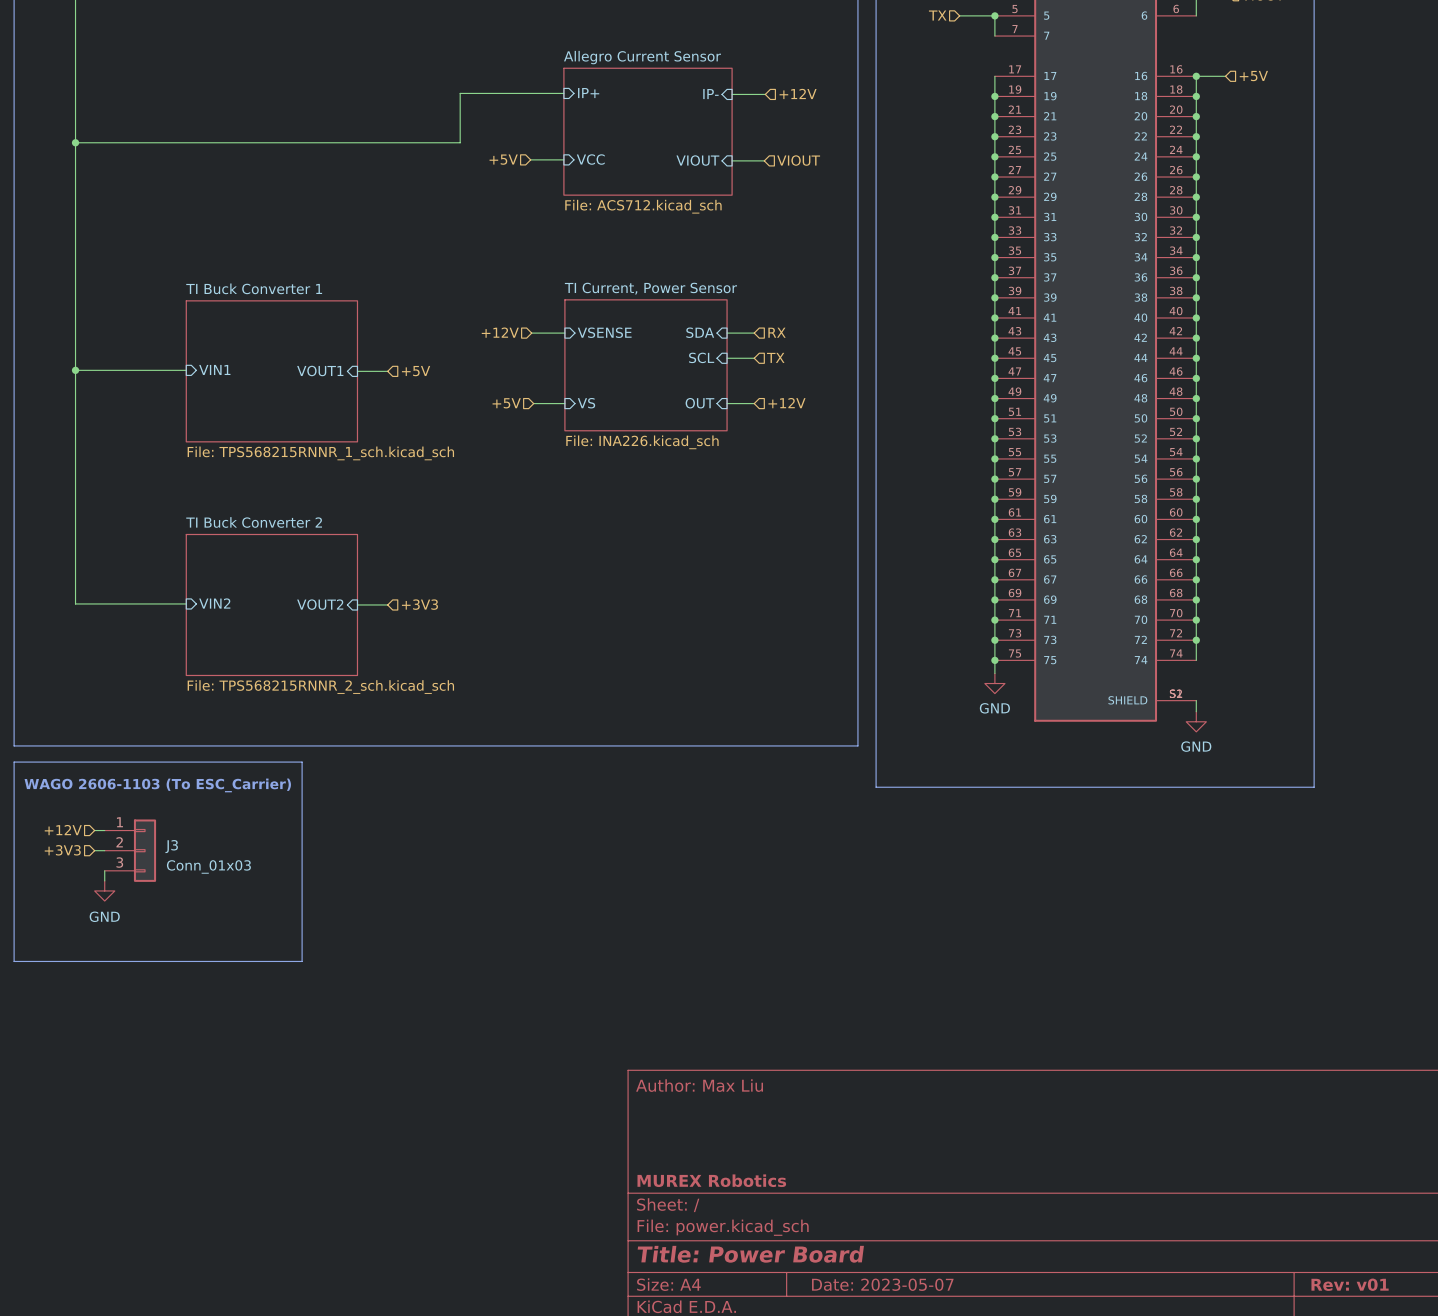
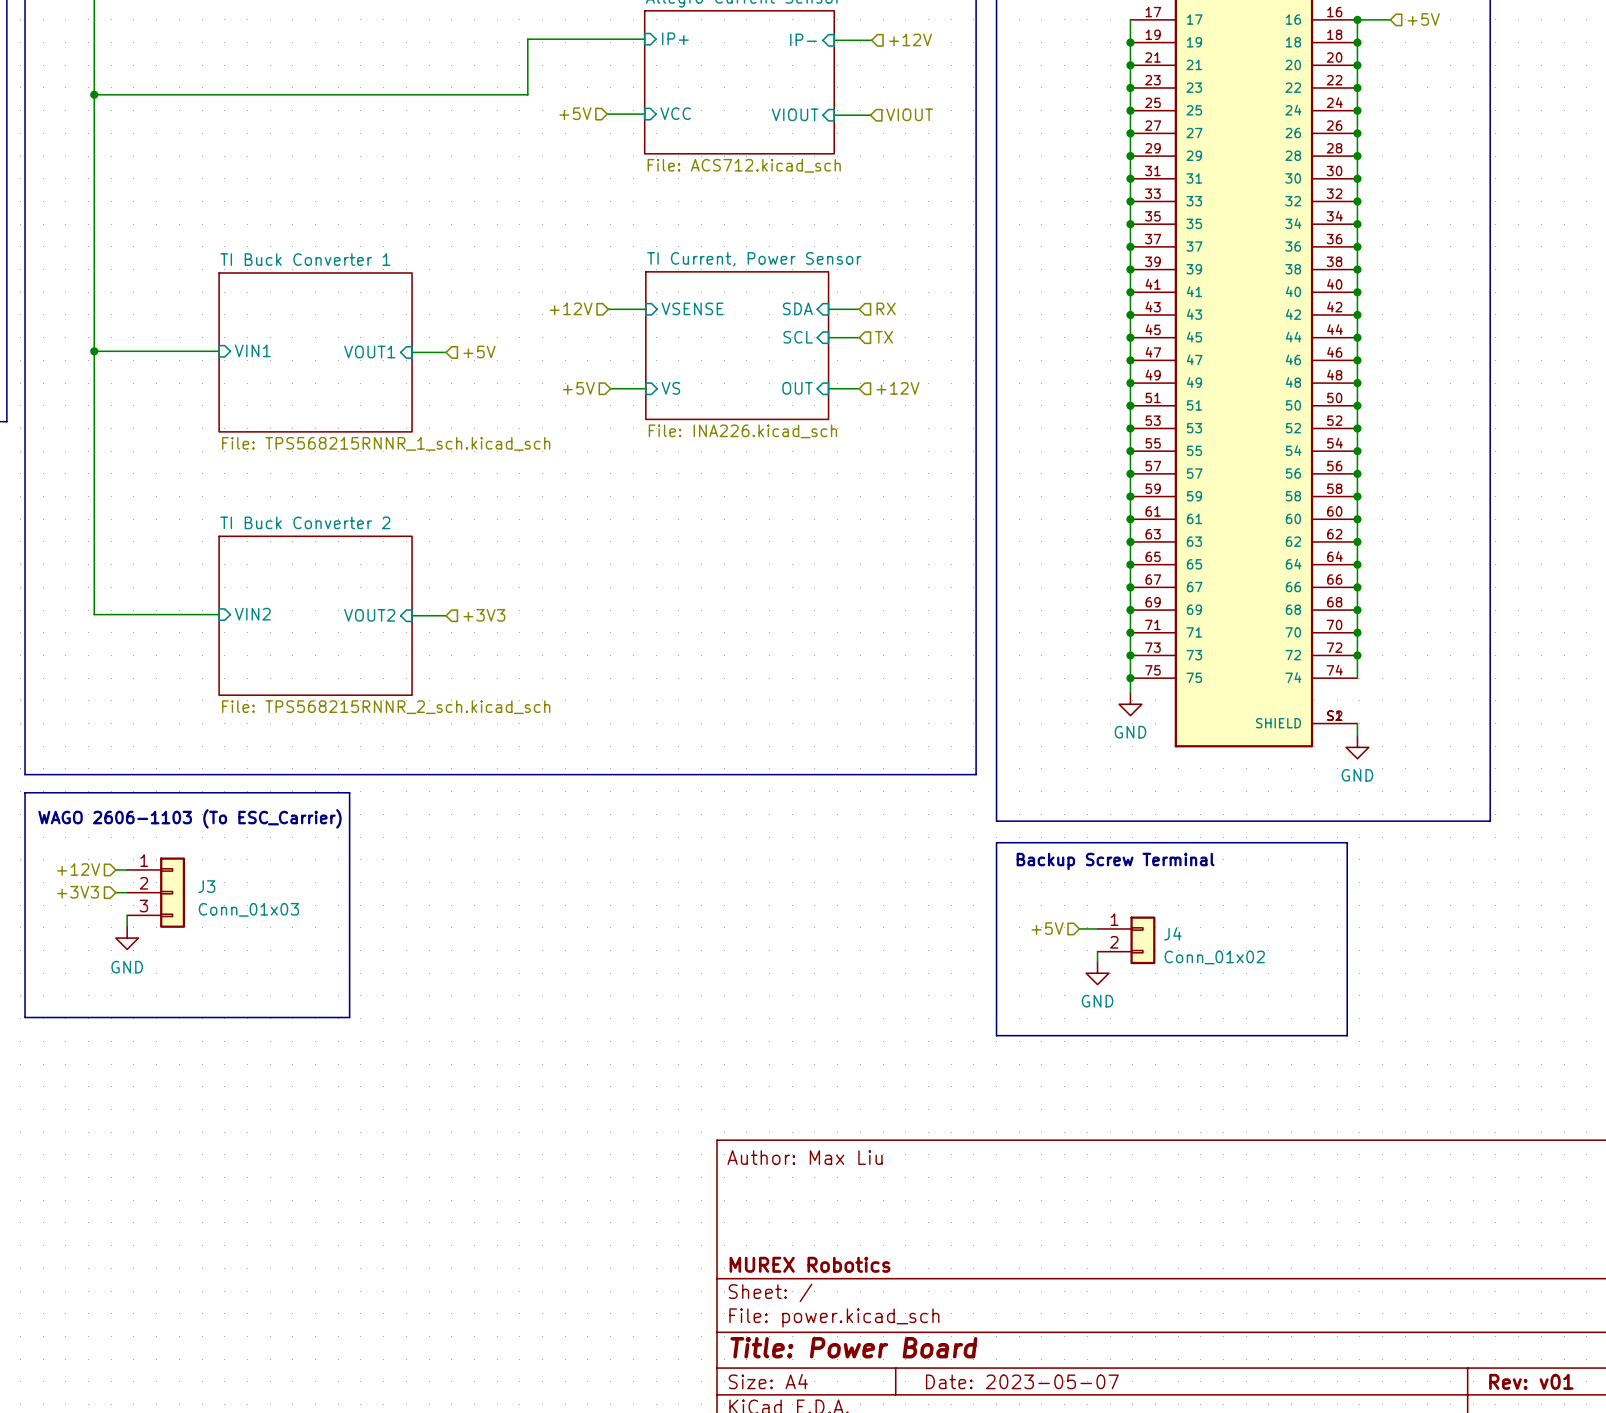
line: none -> (996, 842) (1347, 842) (1347, 1035) (996, 1035) (996, 842)
text: none -> Backup Screw Terminal (1115, 861)
hierarchical label: none -> +5V (1047, 928)
wire: none -> (1079, 928) (1097, 928)
J4: none -> Conn_01x02 (1126, 940)
wire: none -> (1097, 951) (1097, 961)
power symbol: none -> GND (1097, 973)

